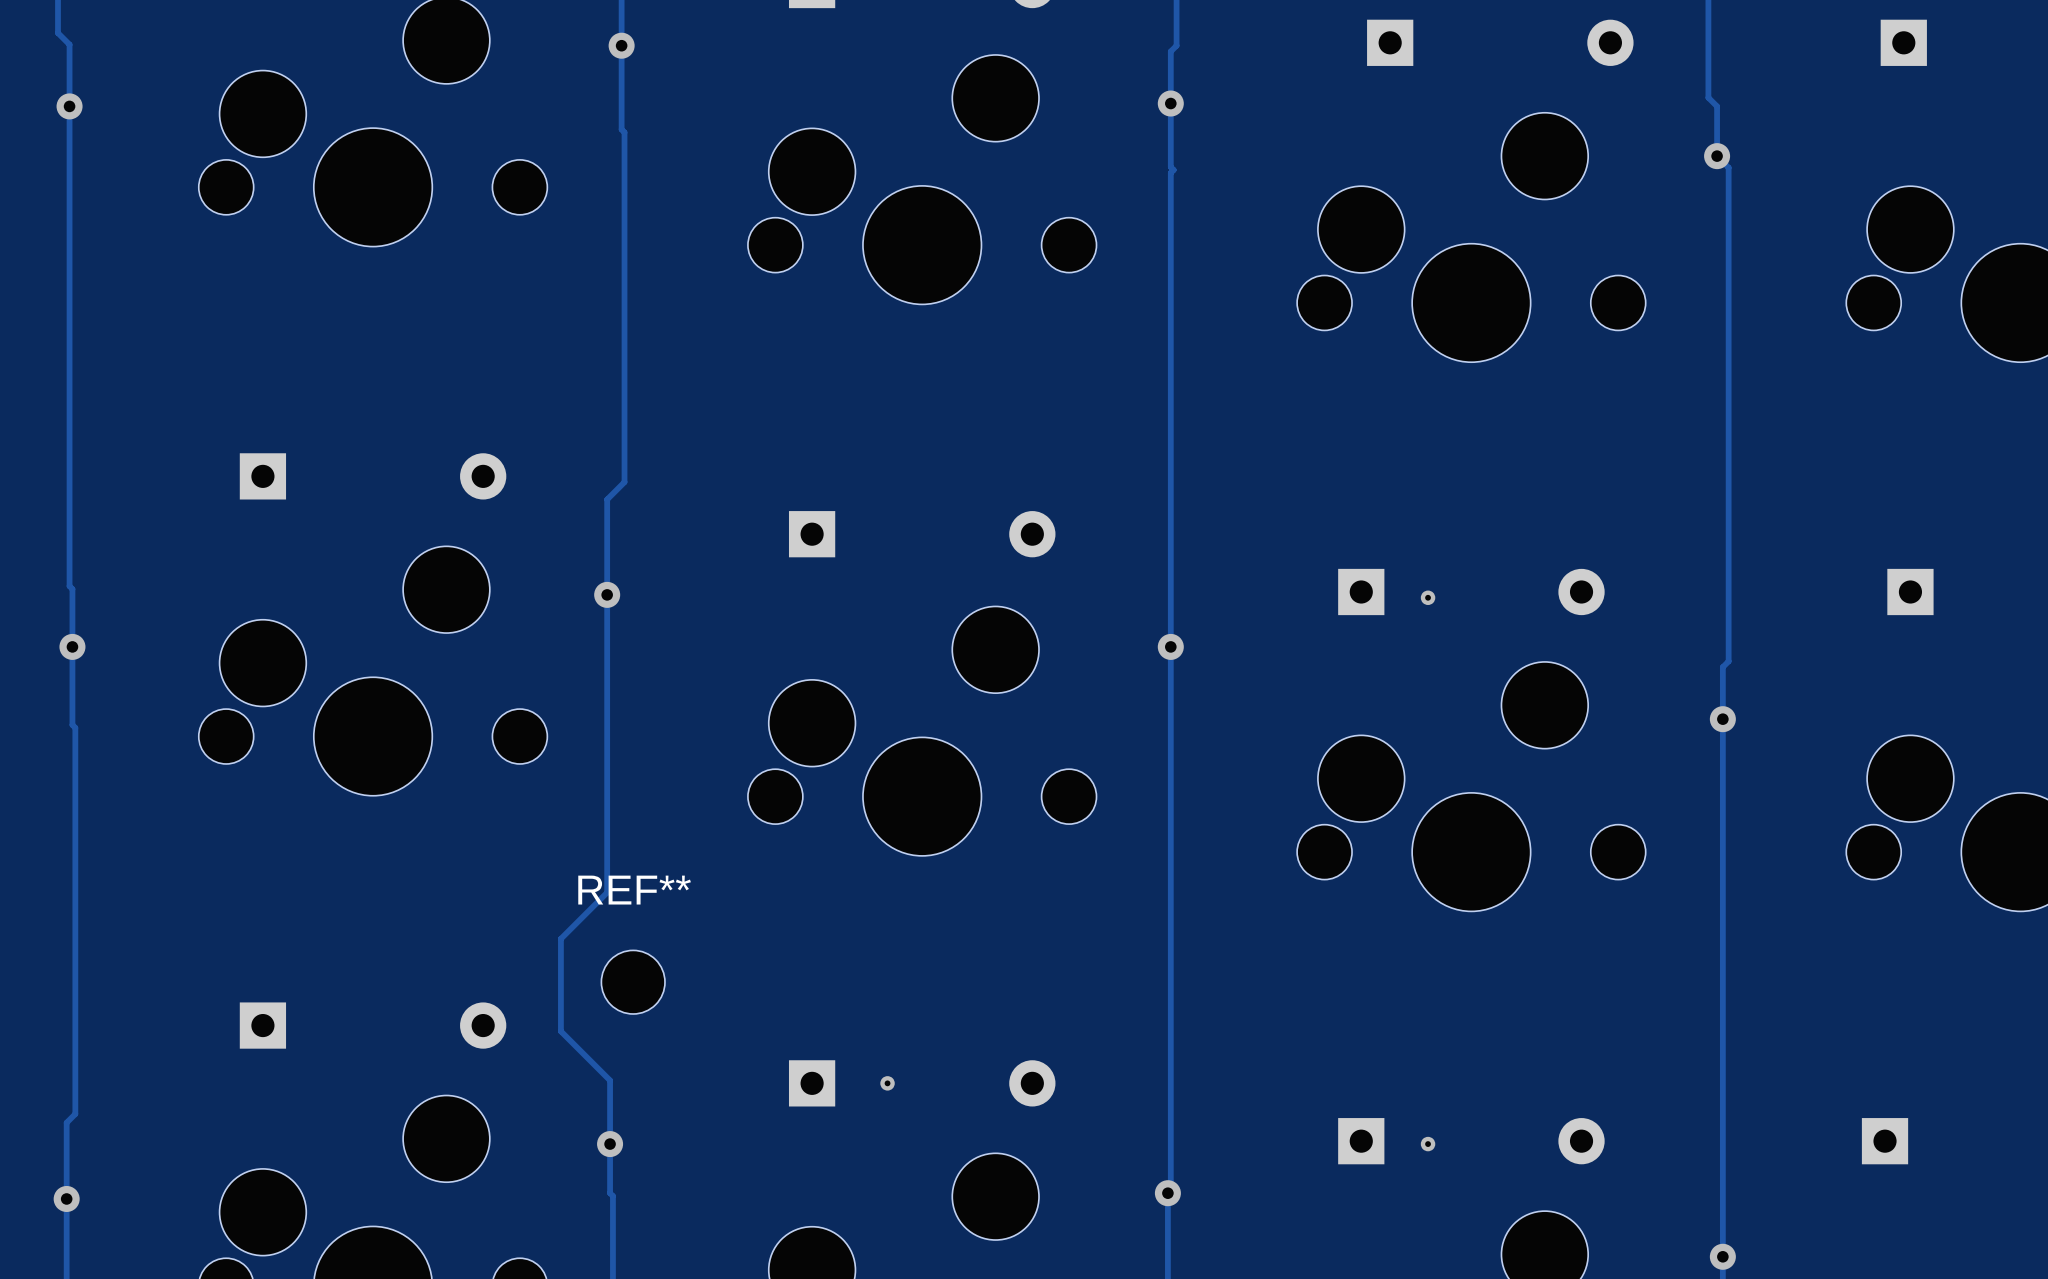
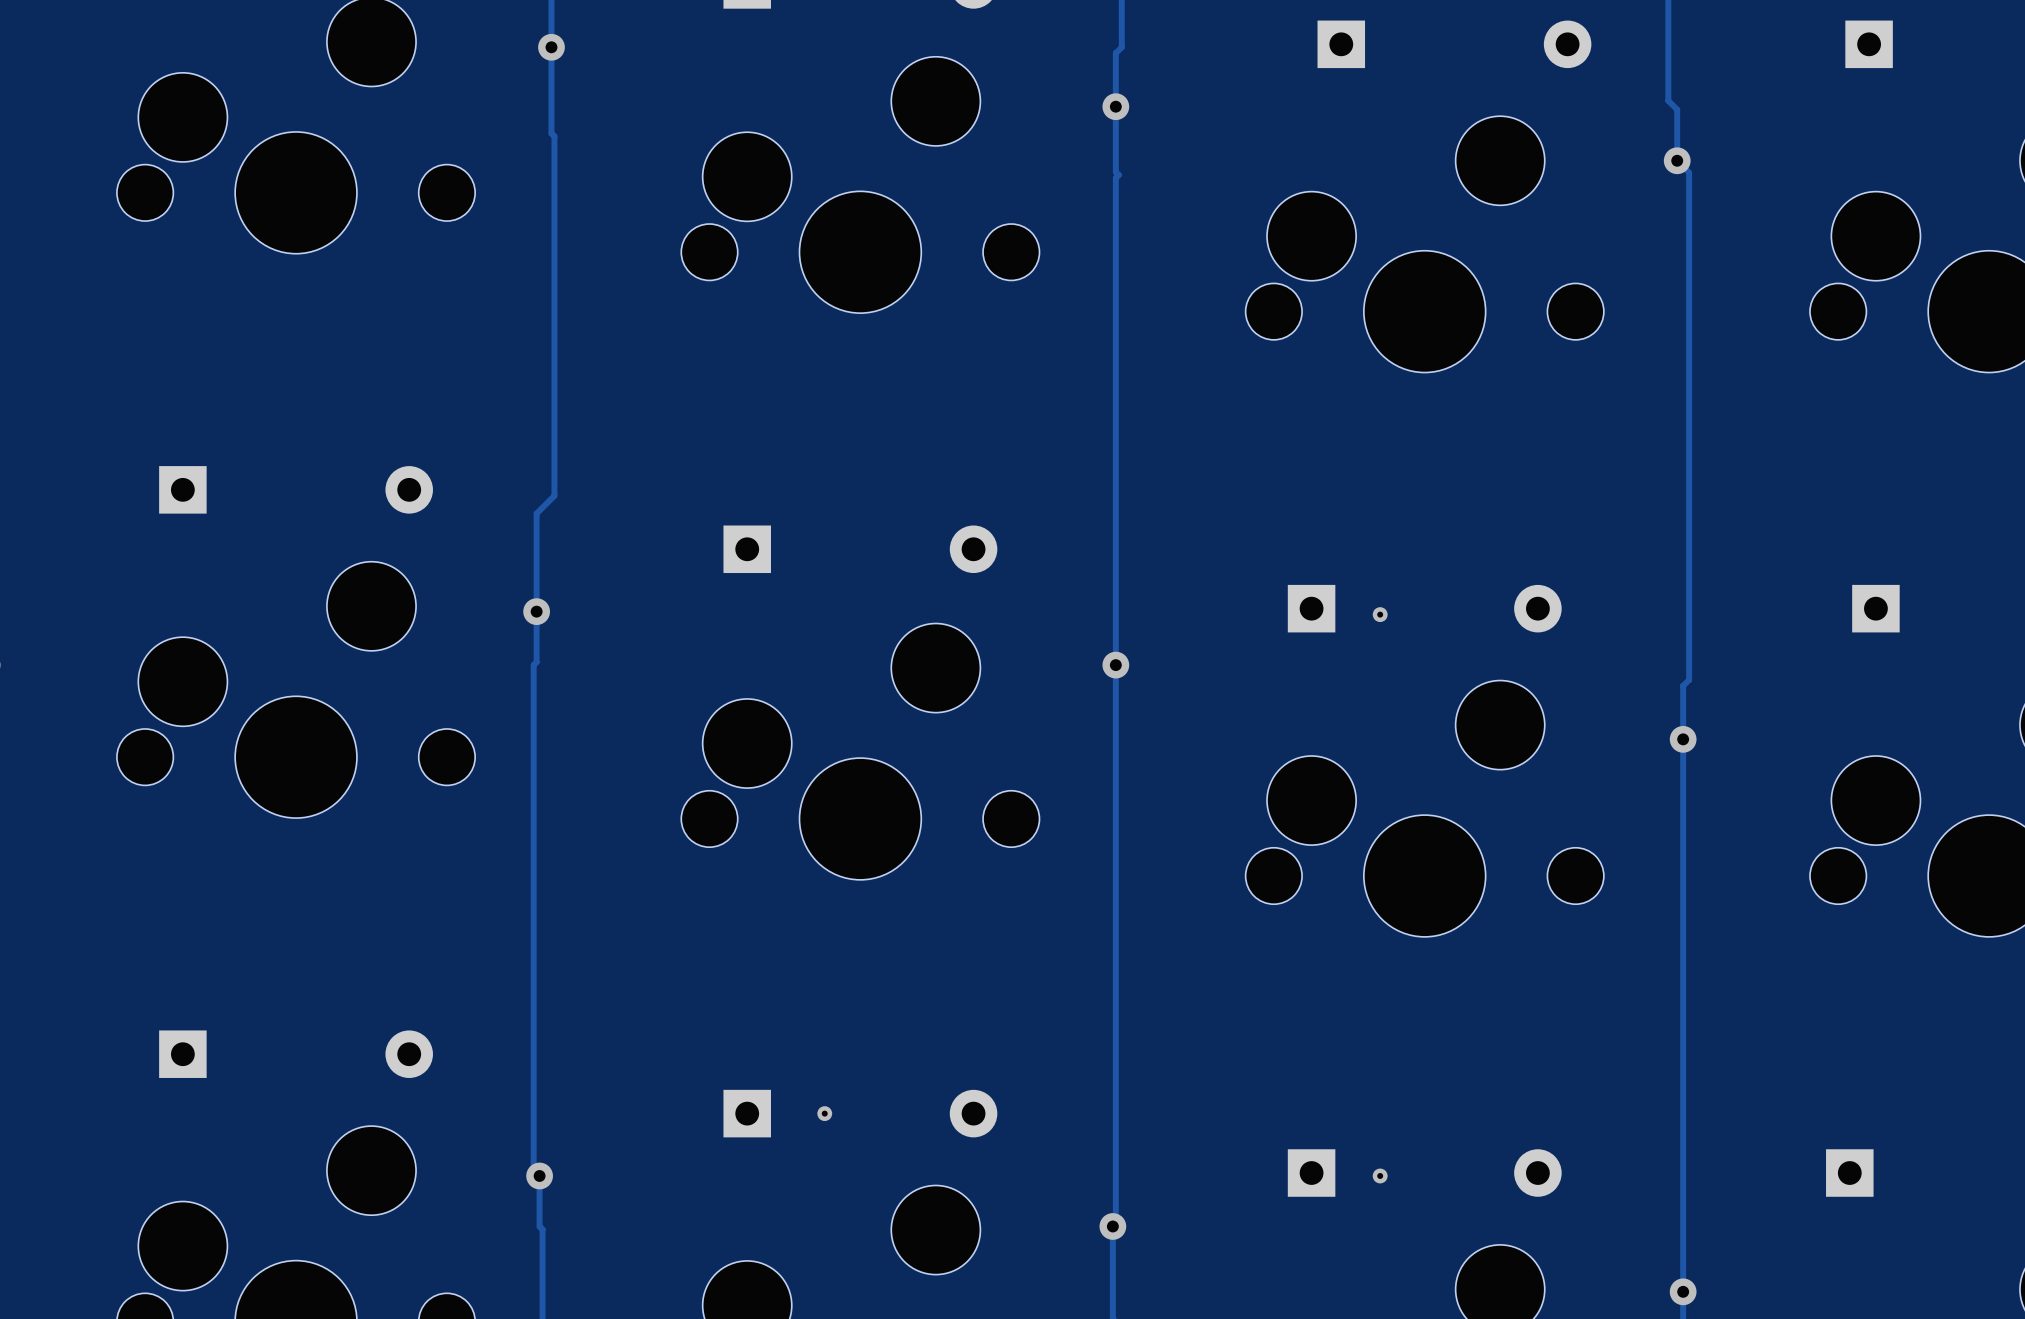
track: (607, 644) (607, 892) (560, 938) (560, 1031) (610, 1080) (610, 1144) -> (536, 662) (533, 665) (533, 1170) (539, 1175)
REF**: (633, 982) -> none

